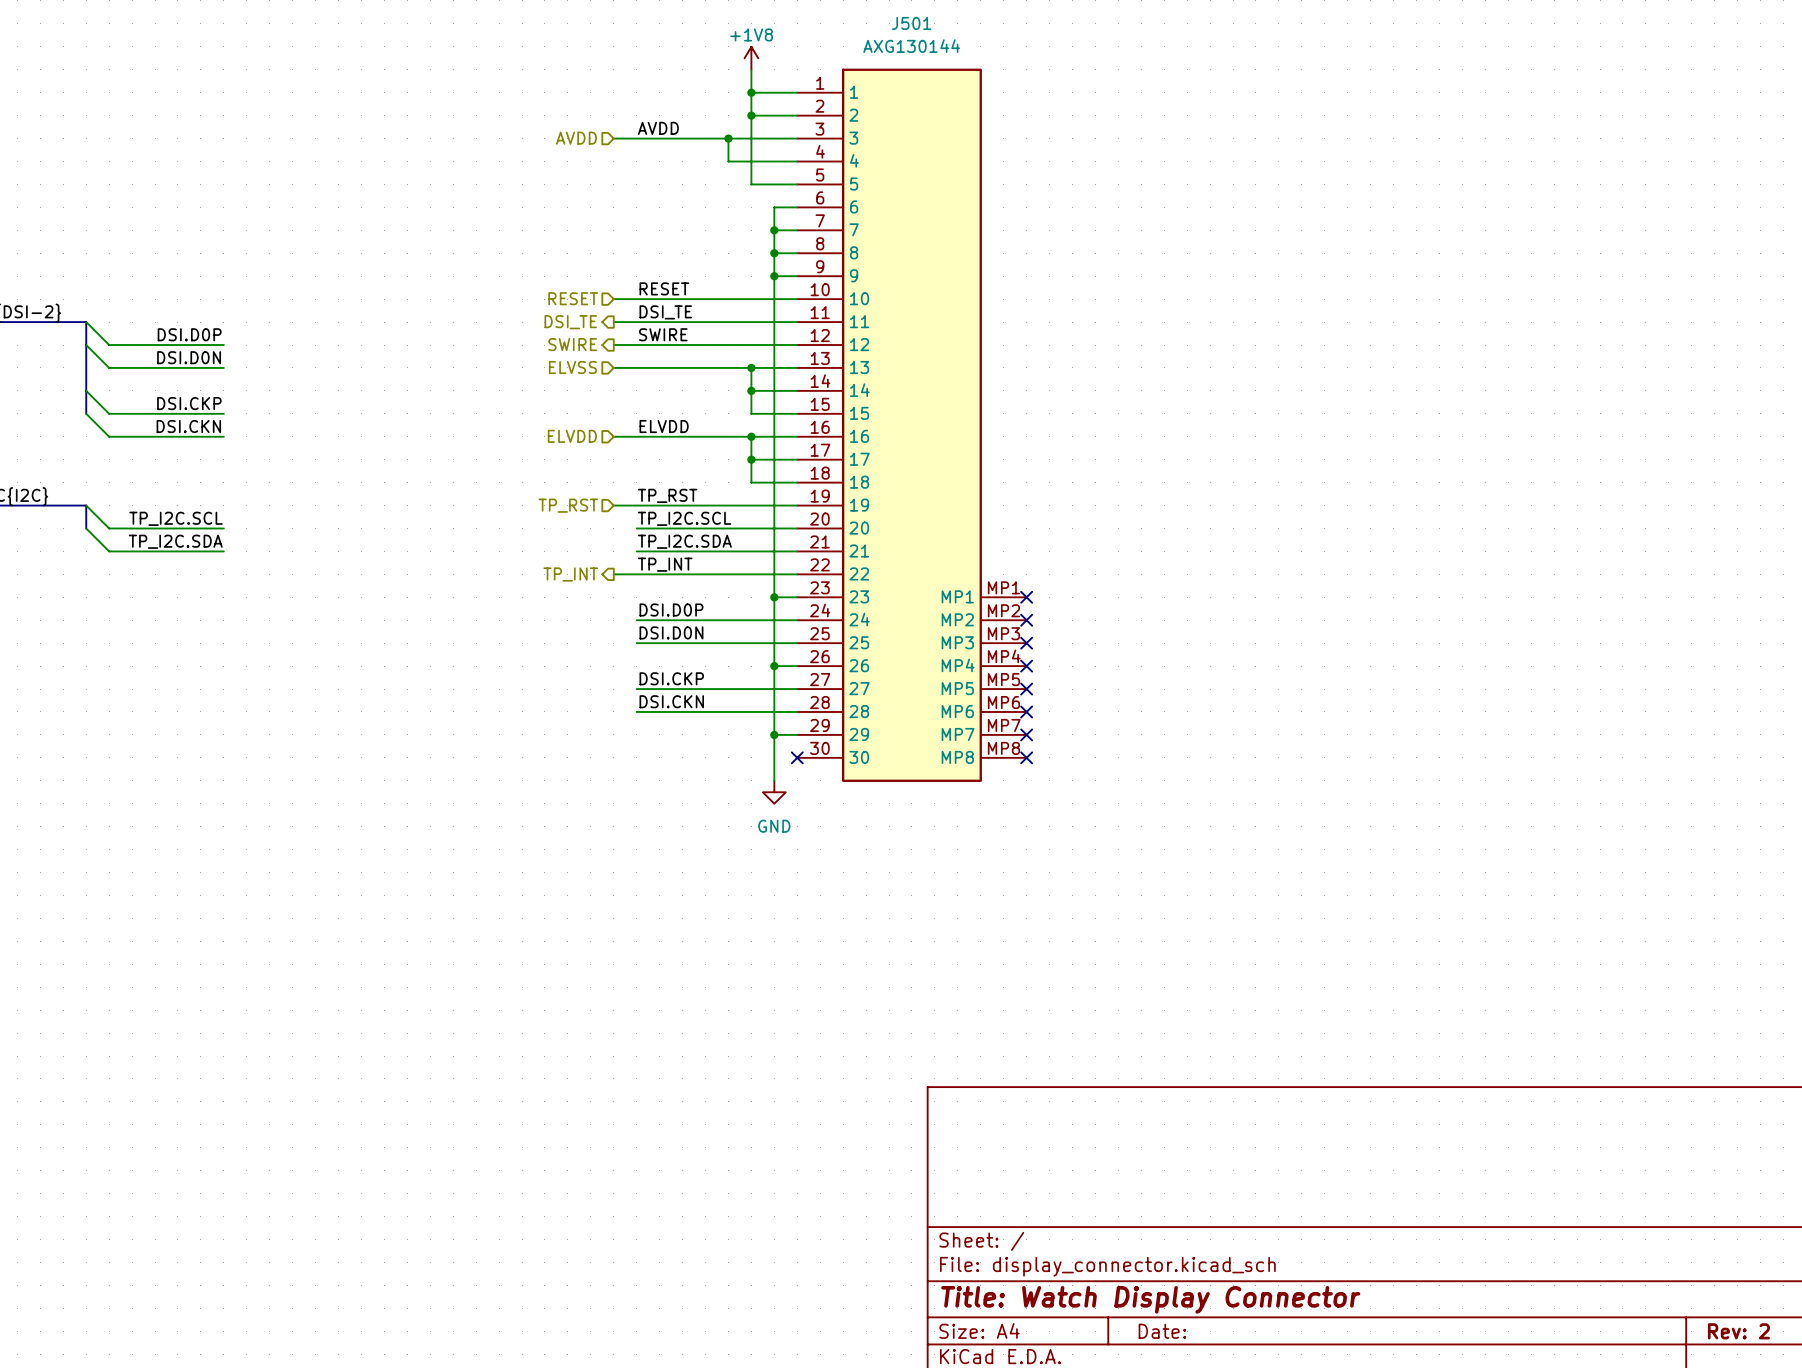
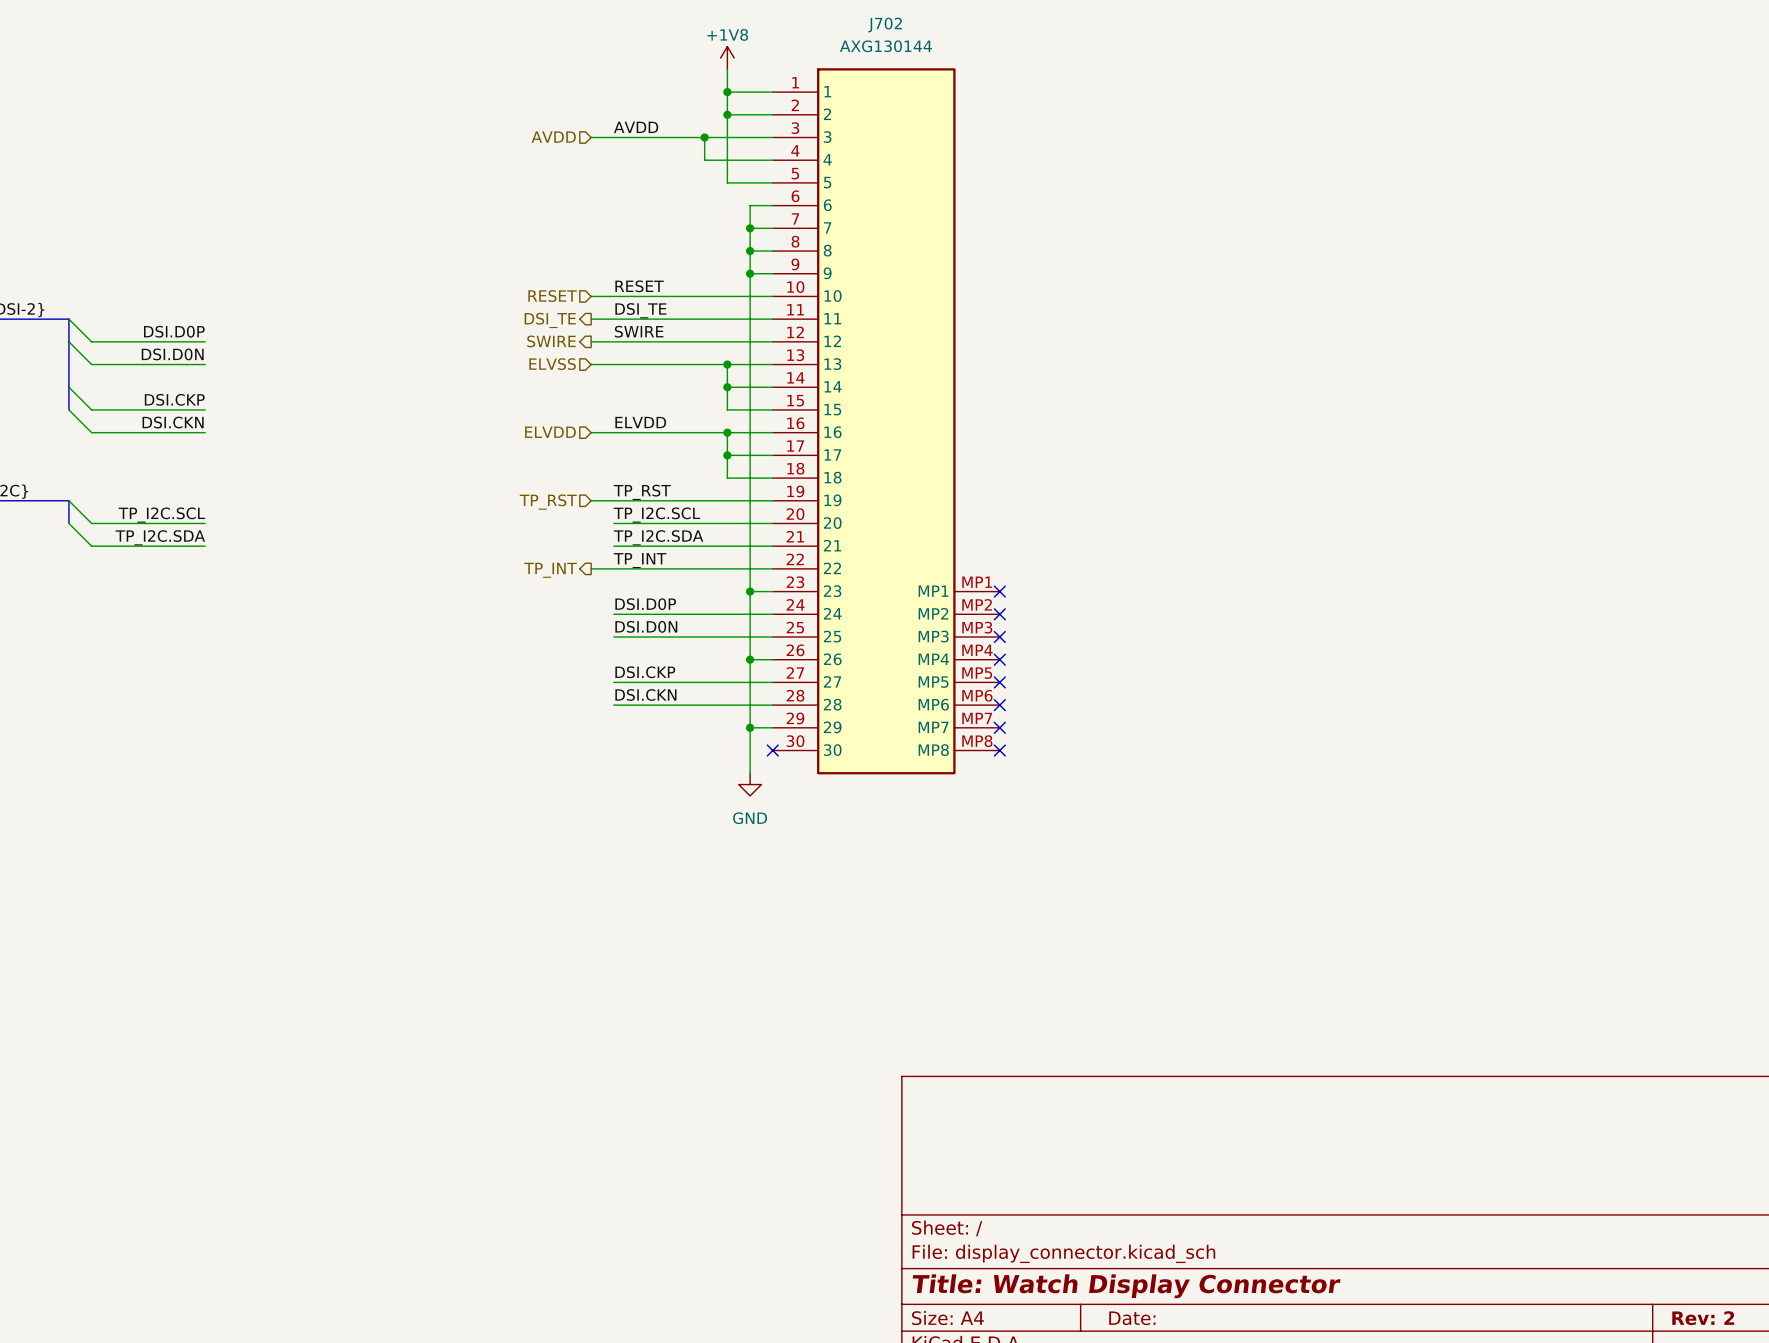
J501 name: J501 (911, 23) -> J702 (885, 25)

